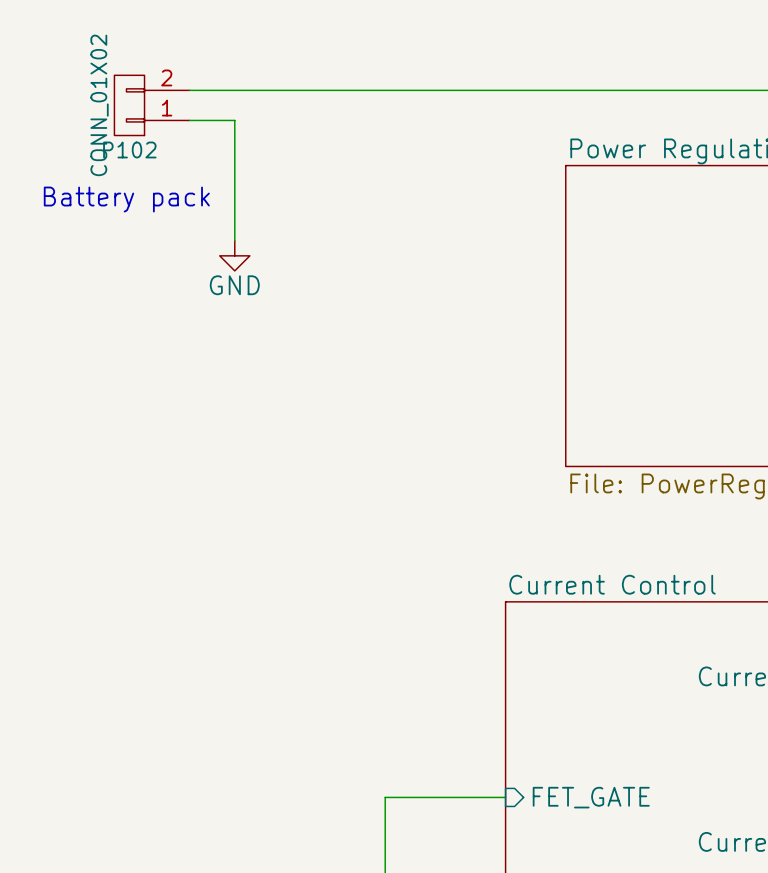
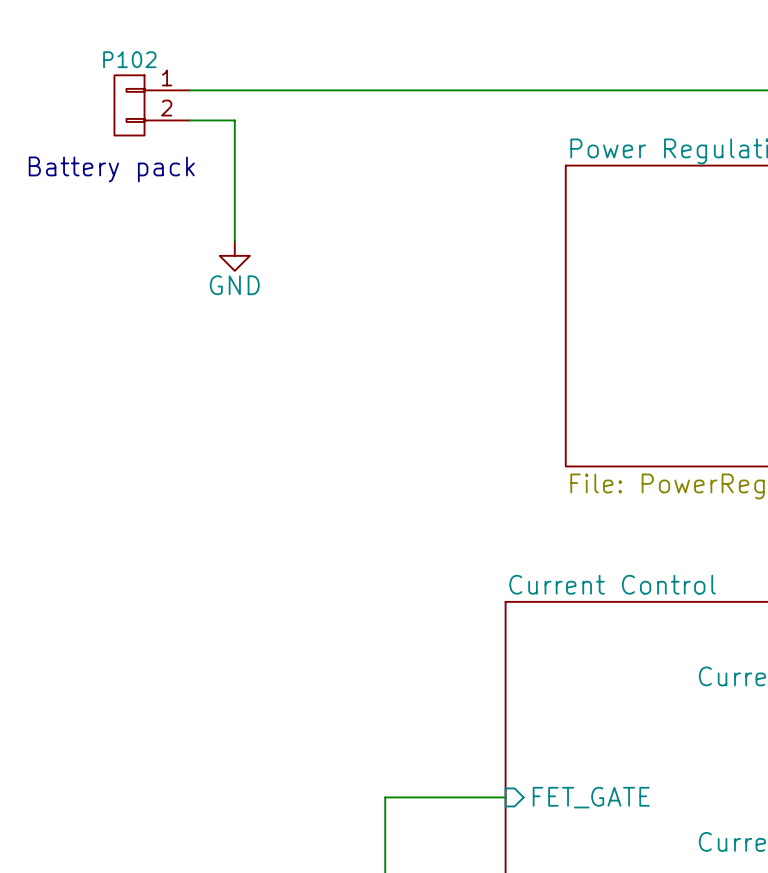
P102 value: CONN_01X02 (99, 105) -> none
P102 flip: as is (129, 105) -> up-down (129, 105)
text position: Battery pack (126, 199) -> Battery pack (111, 169)

